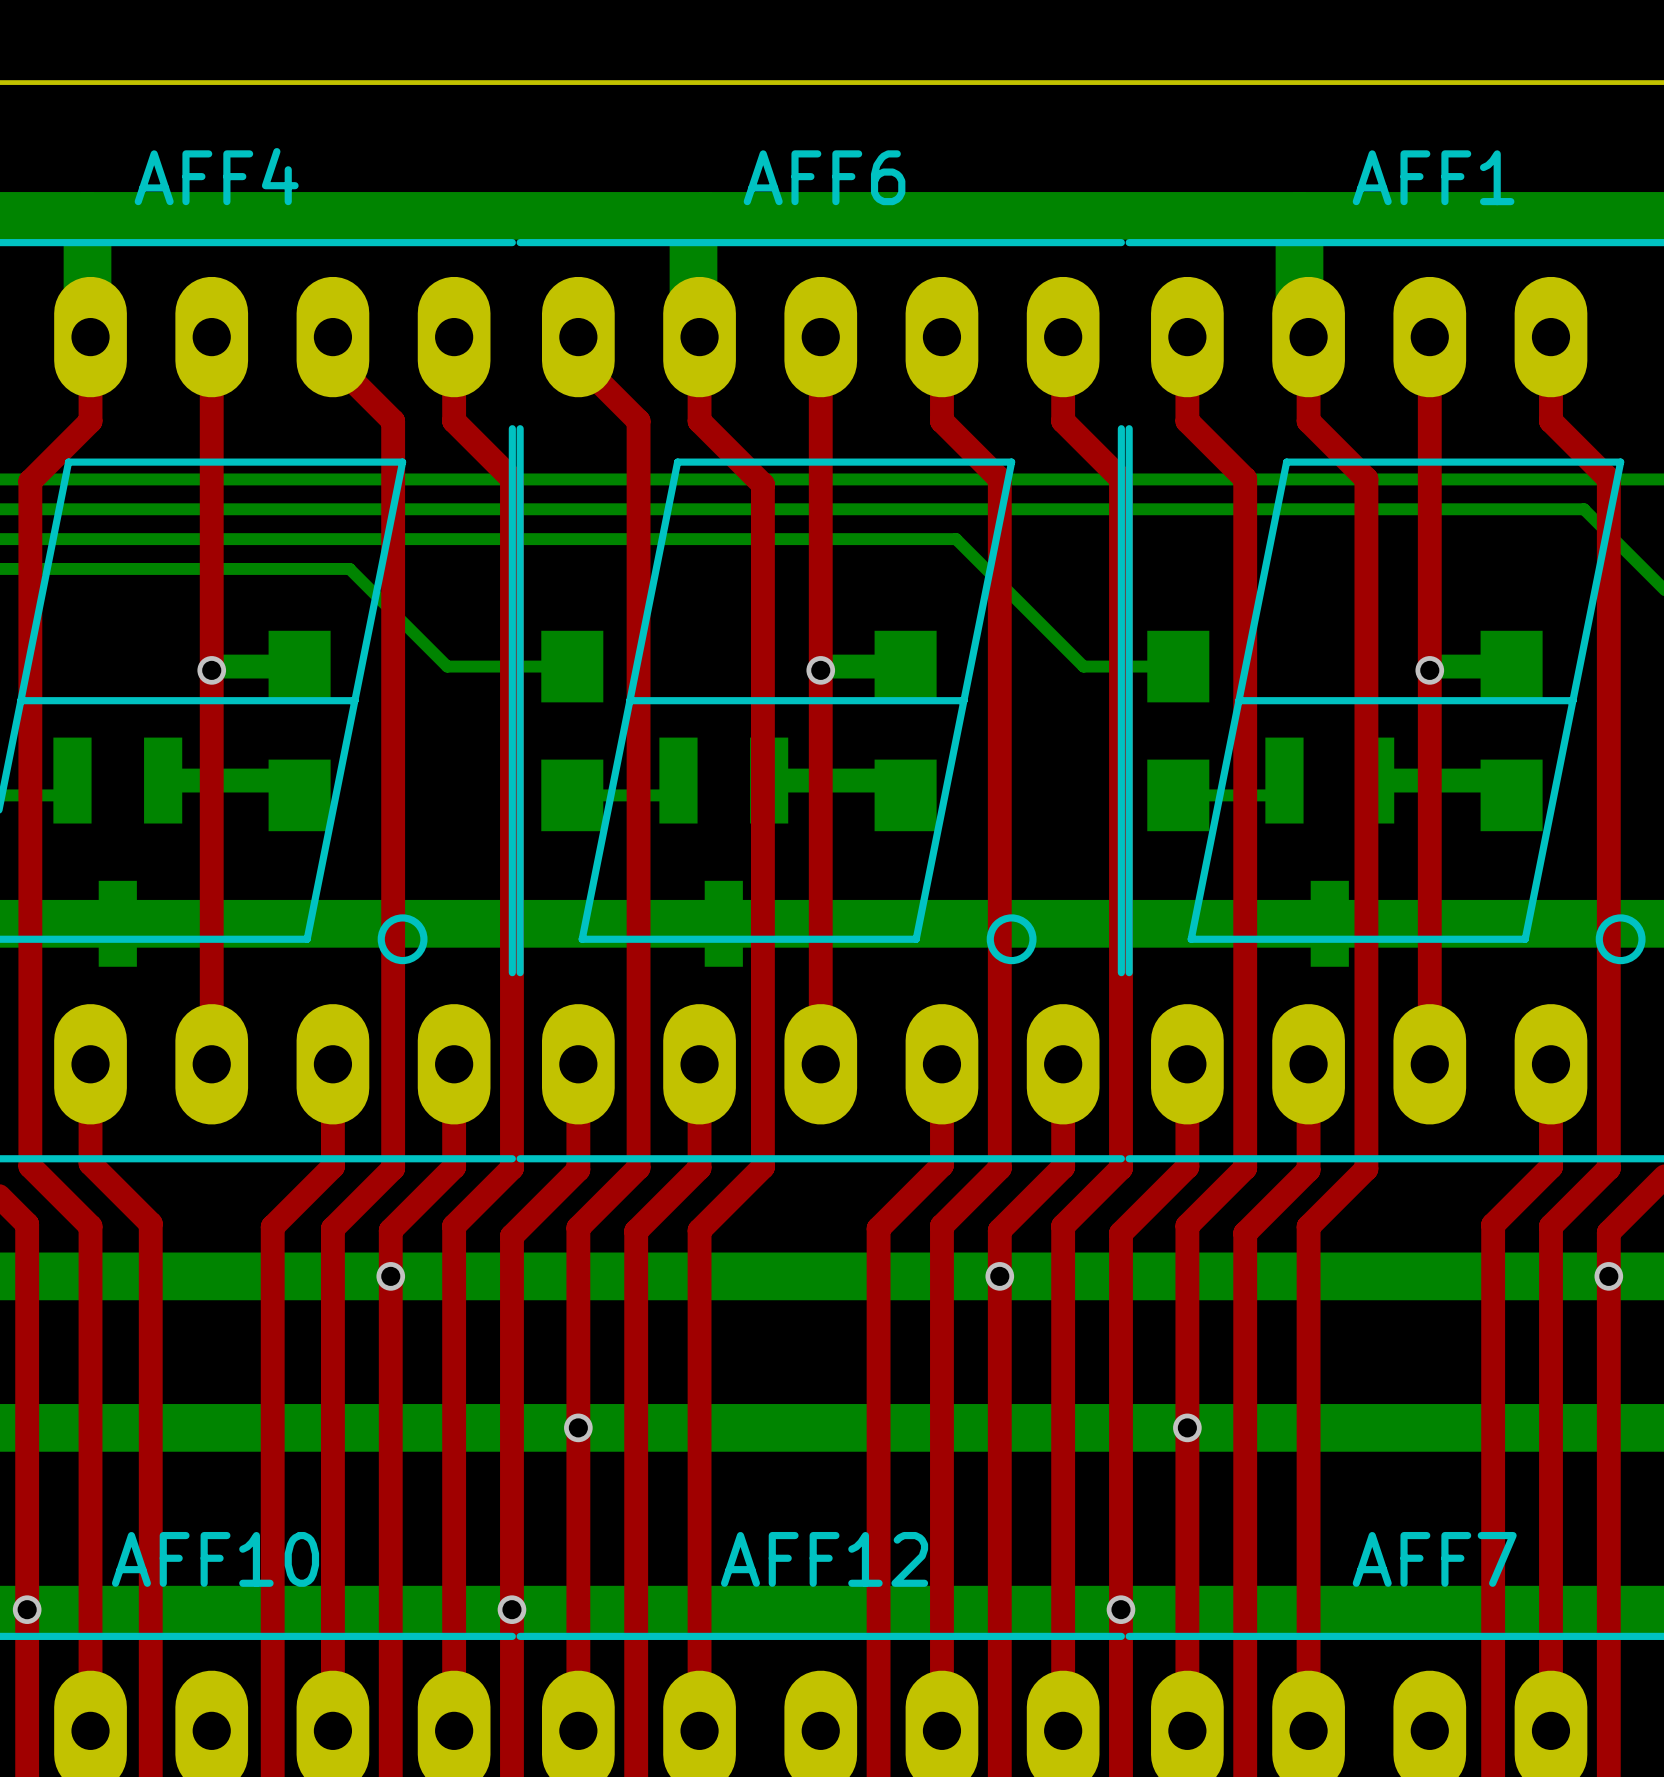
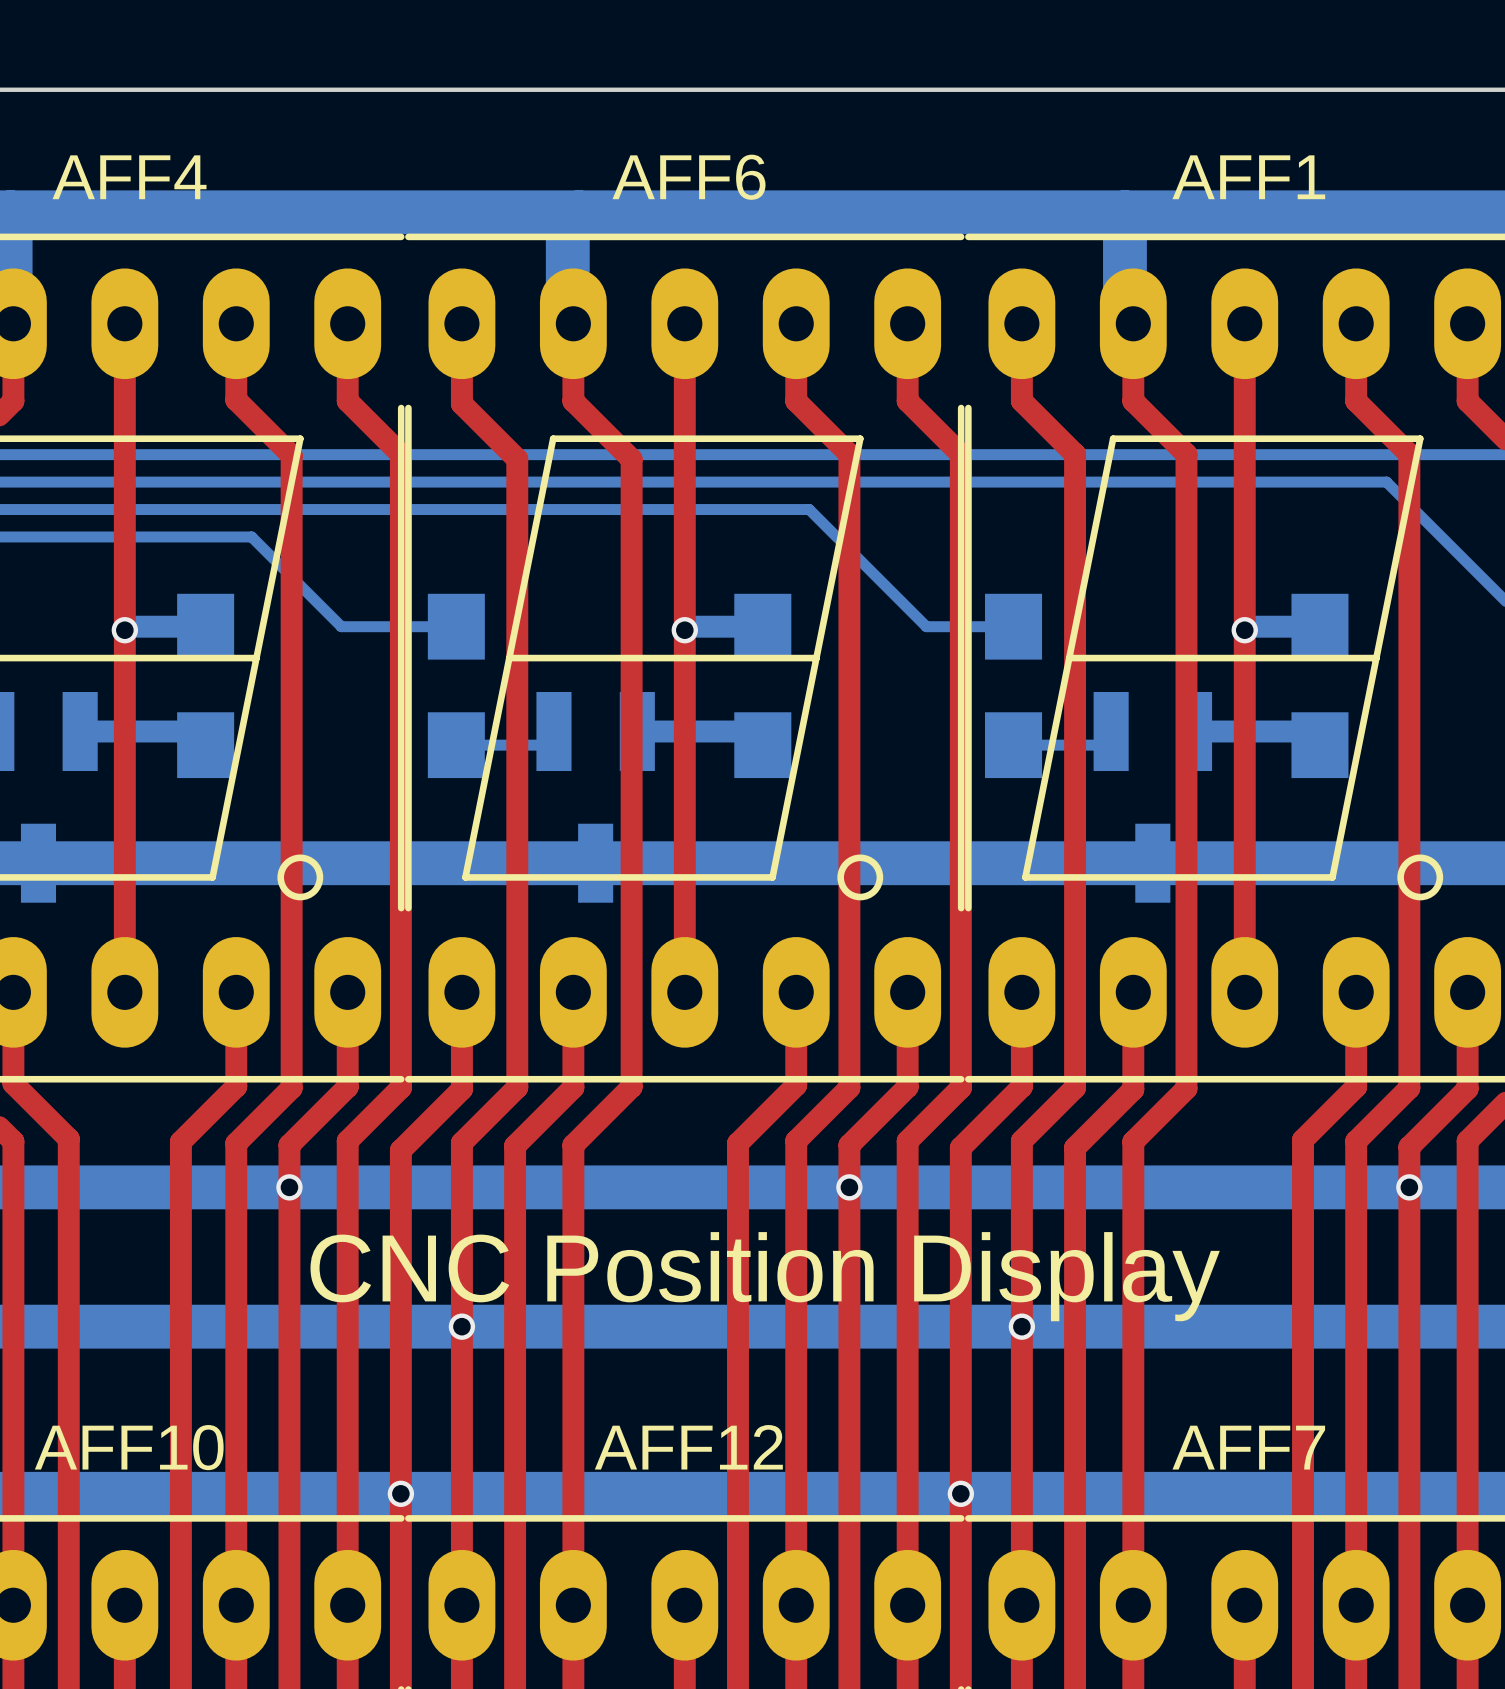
top track: (332, 360) (393, 421) (393, 480) -> (236, 345) (236, 399) (291, 455)
top track: (578, 360) (638, 421) (638, 484) -> (461, 345) (461, 403) (517, 459)
text: none -> CNC Position Display (765, 1276)

